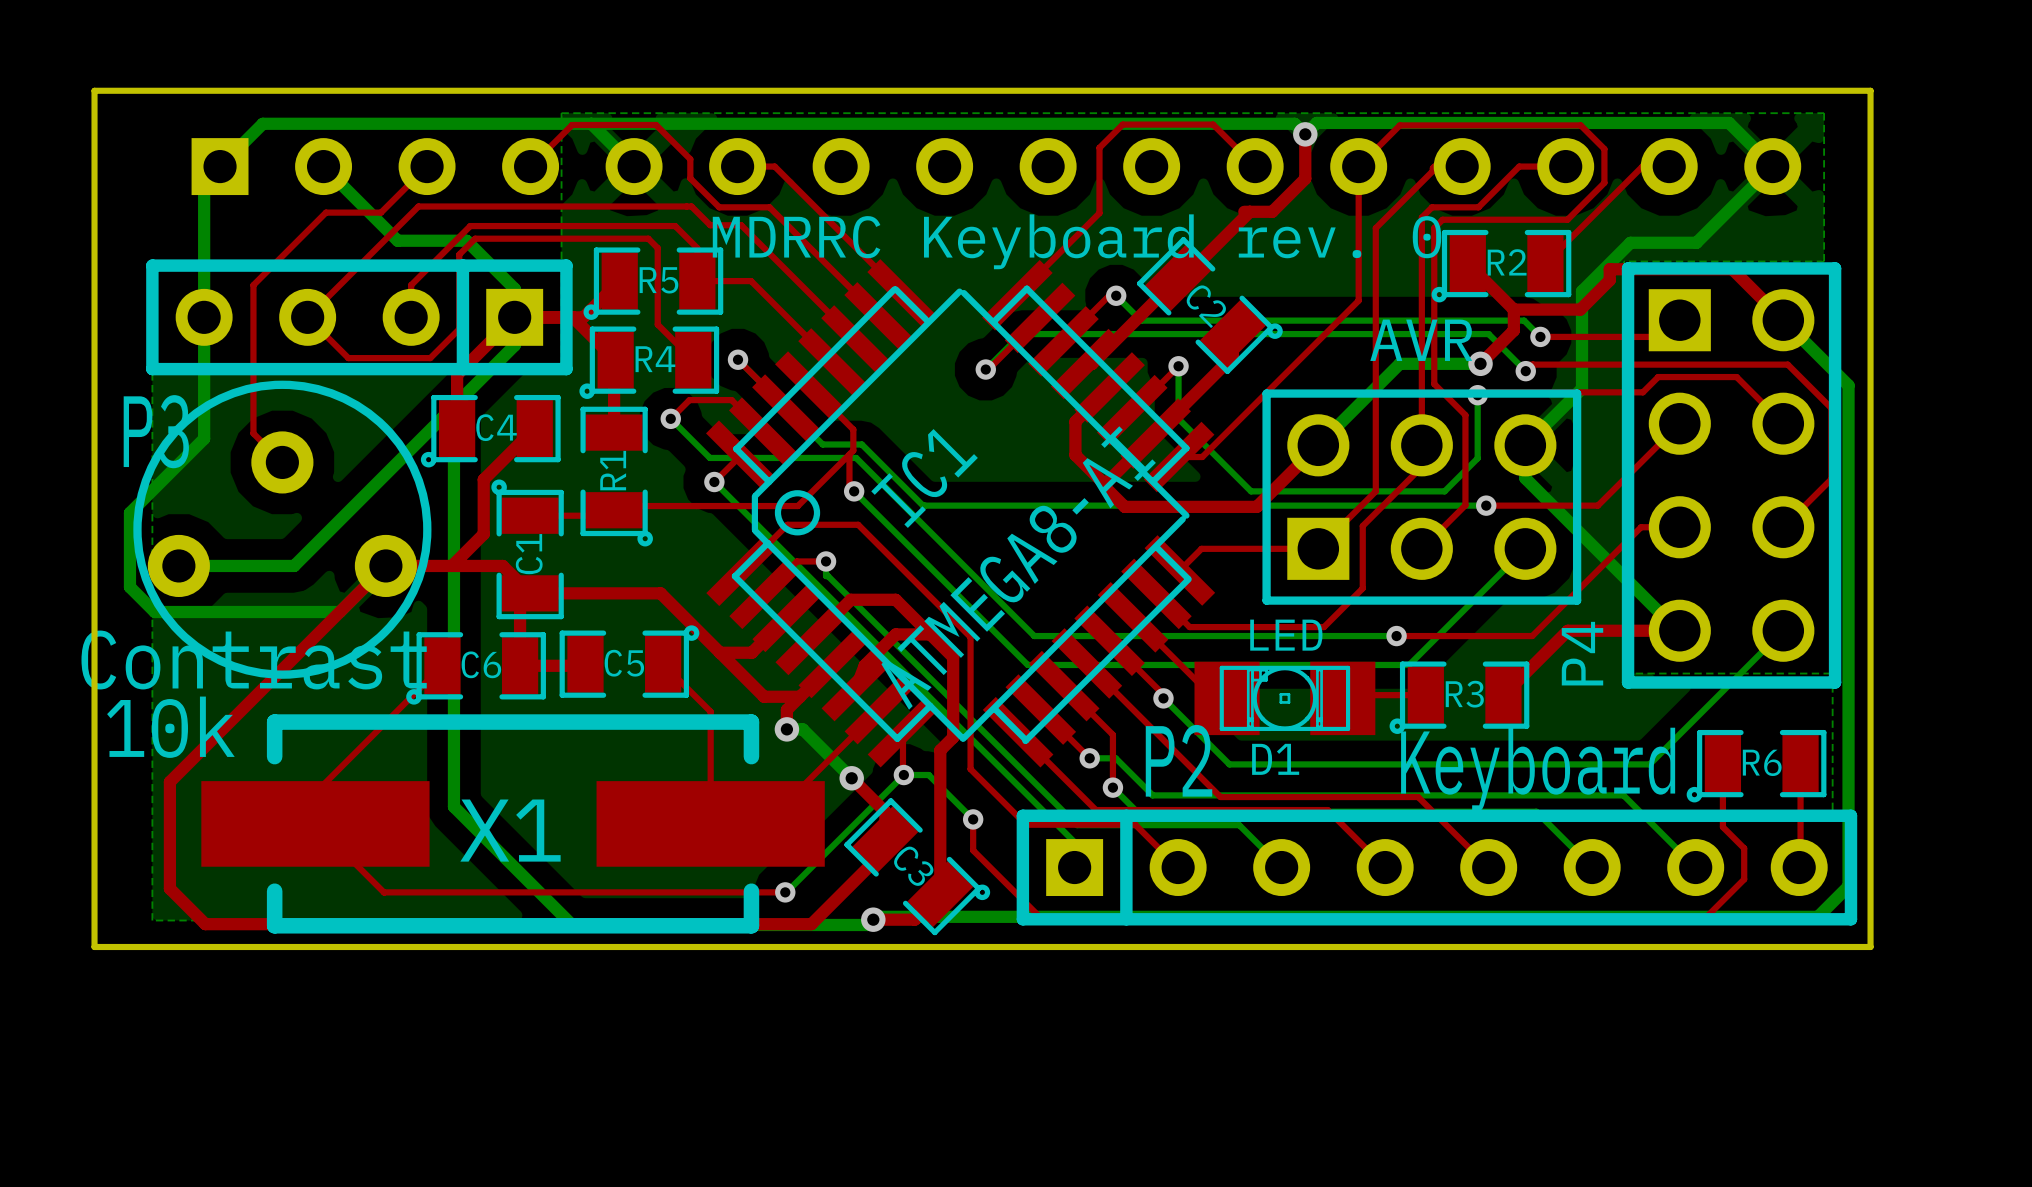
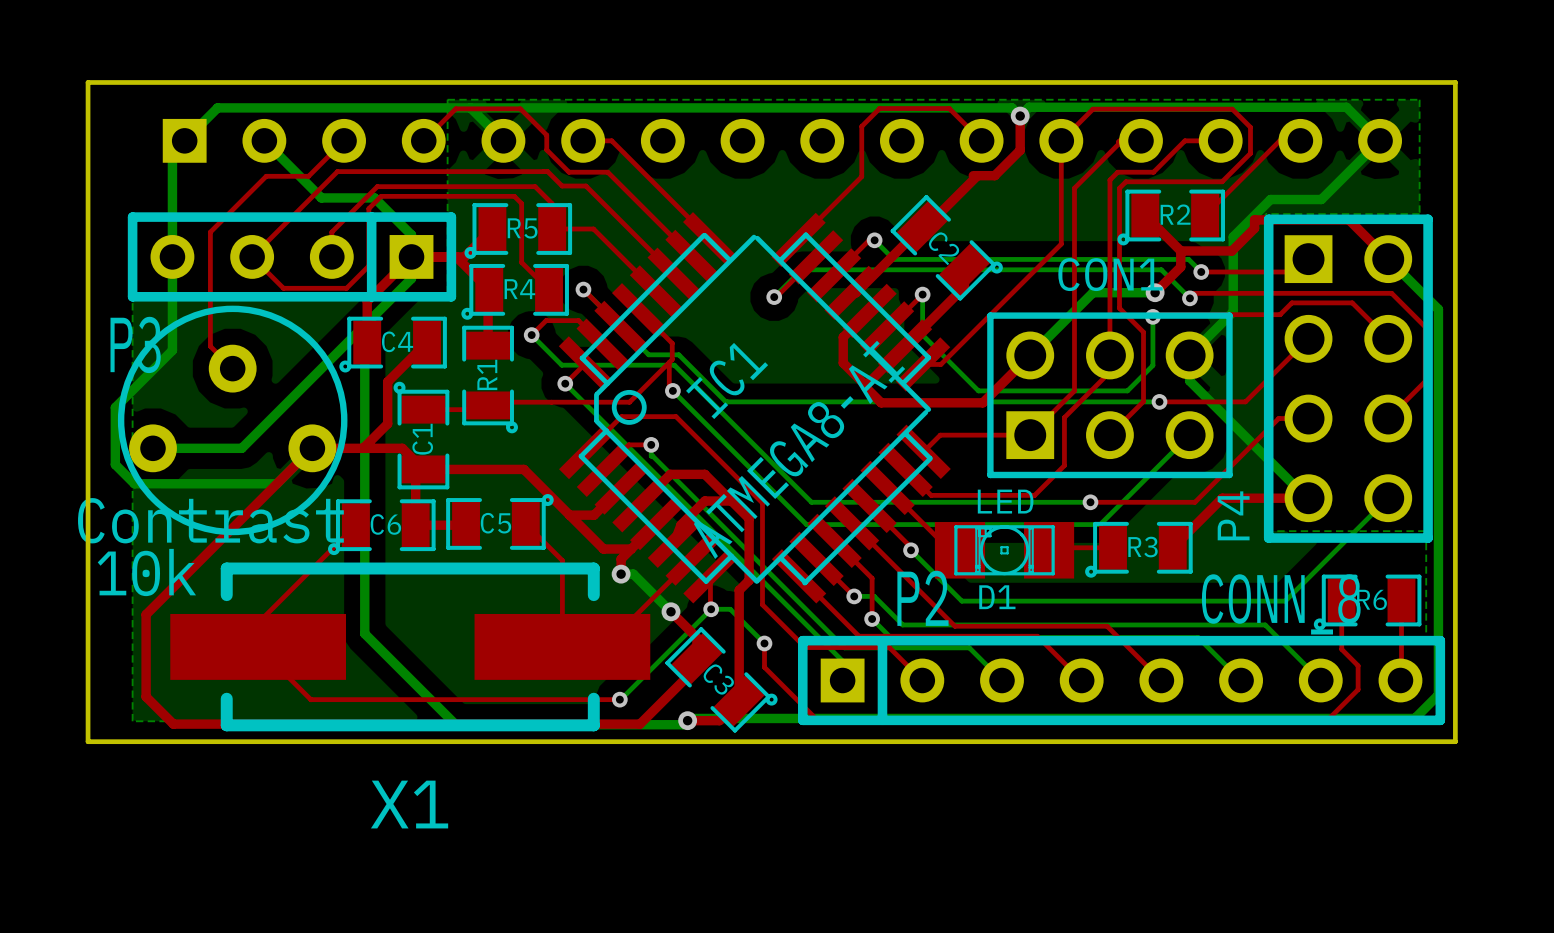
text: MDRRC Keyboard rev. 0 (1077, 241) -> none
AVR name: AVR (1421, 340) -> CON1 (1110, 274)
P2 value: Keyboard (1538, 769) -> CONN_8 (1281, 604)
X1 name position: X1 (510, 830) -> X1 (409, 804)

